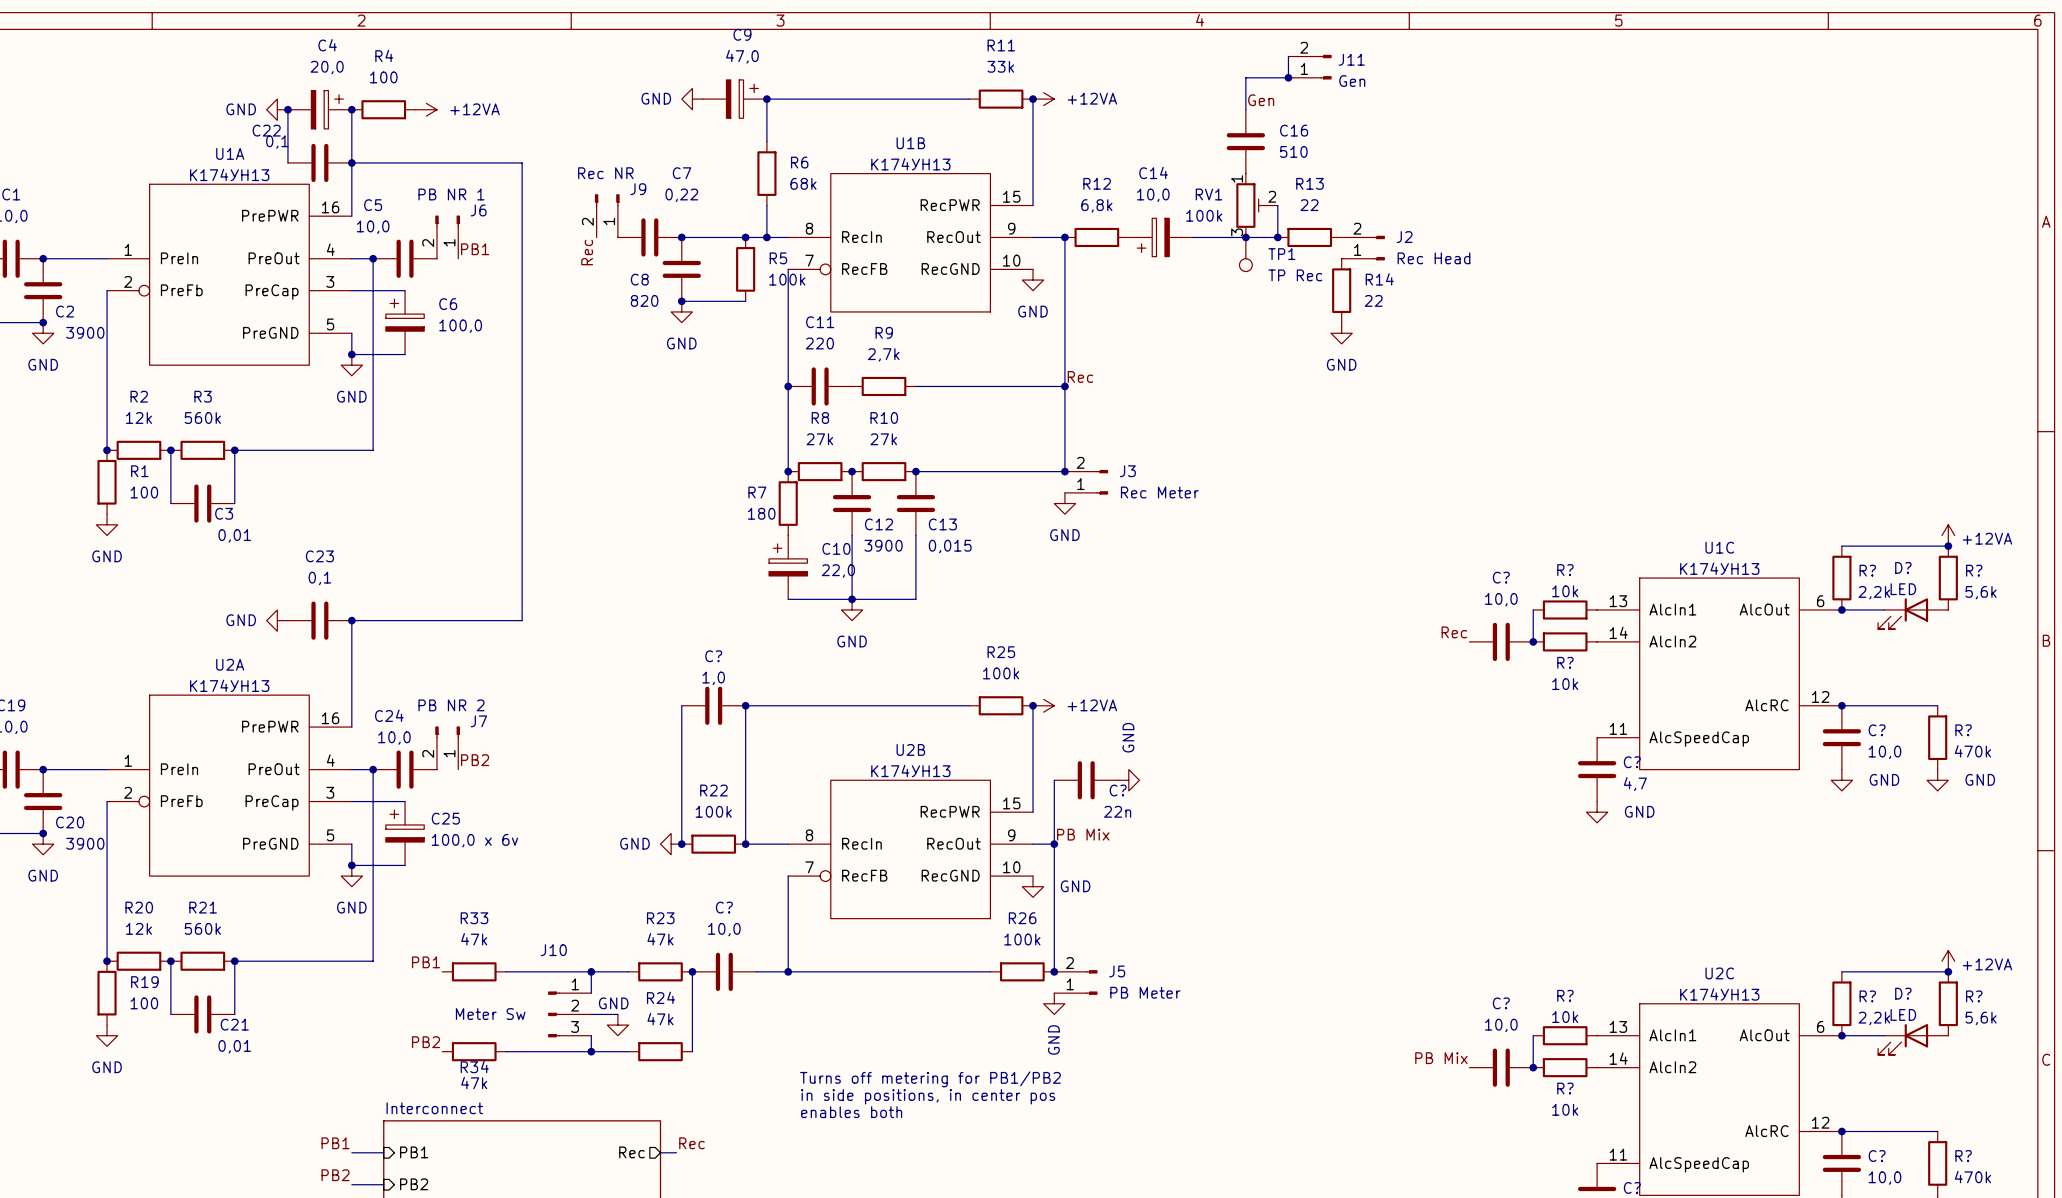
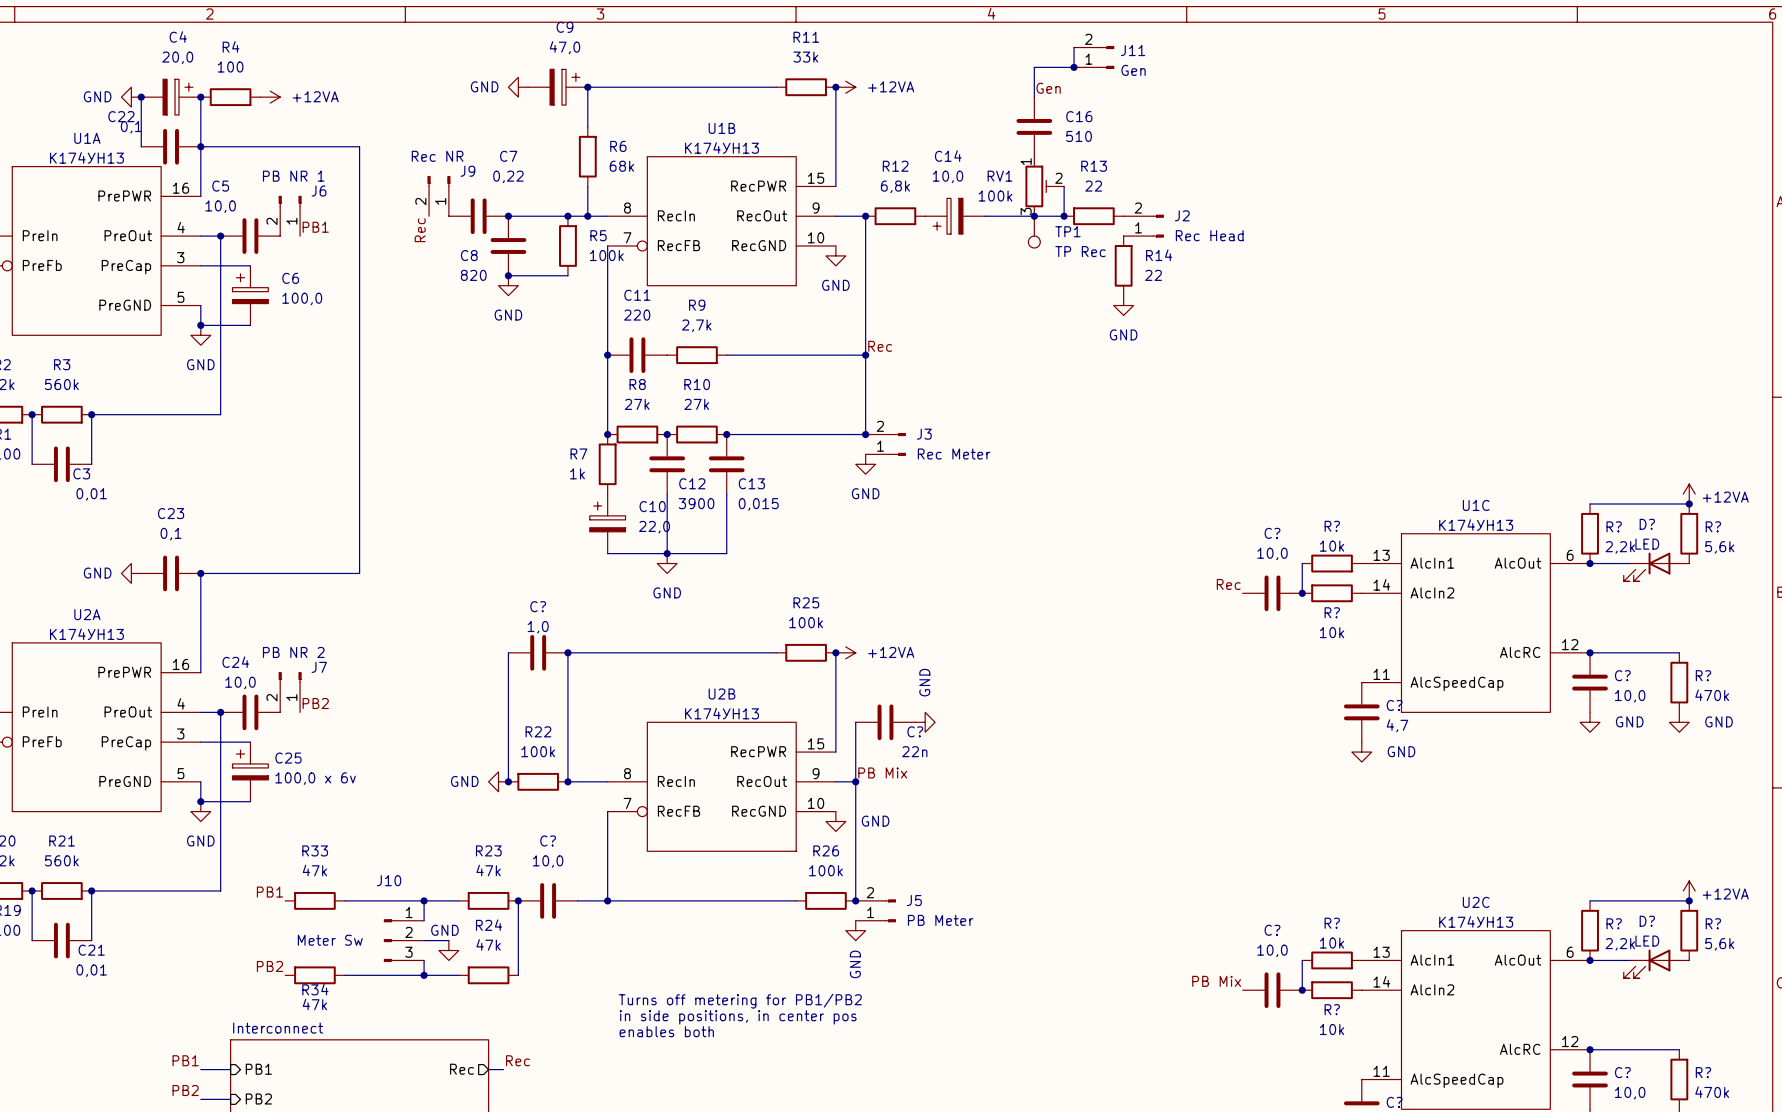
R7 value: 180 (761, 513) -> 1k (577, 473)

